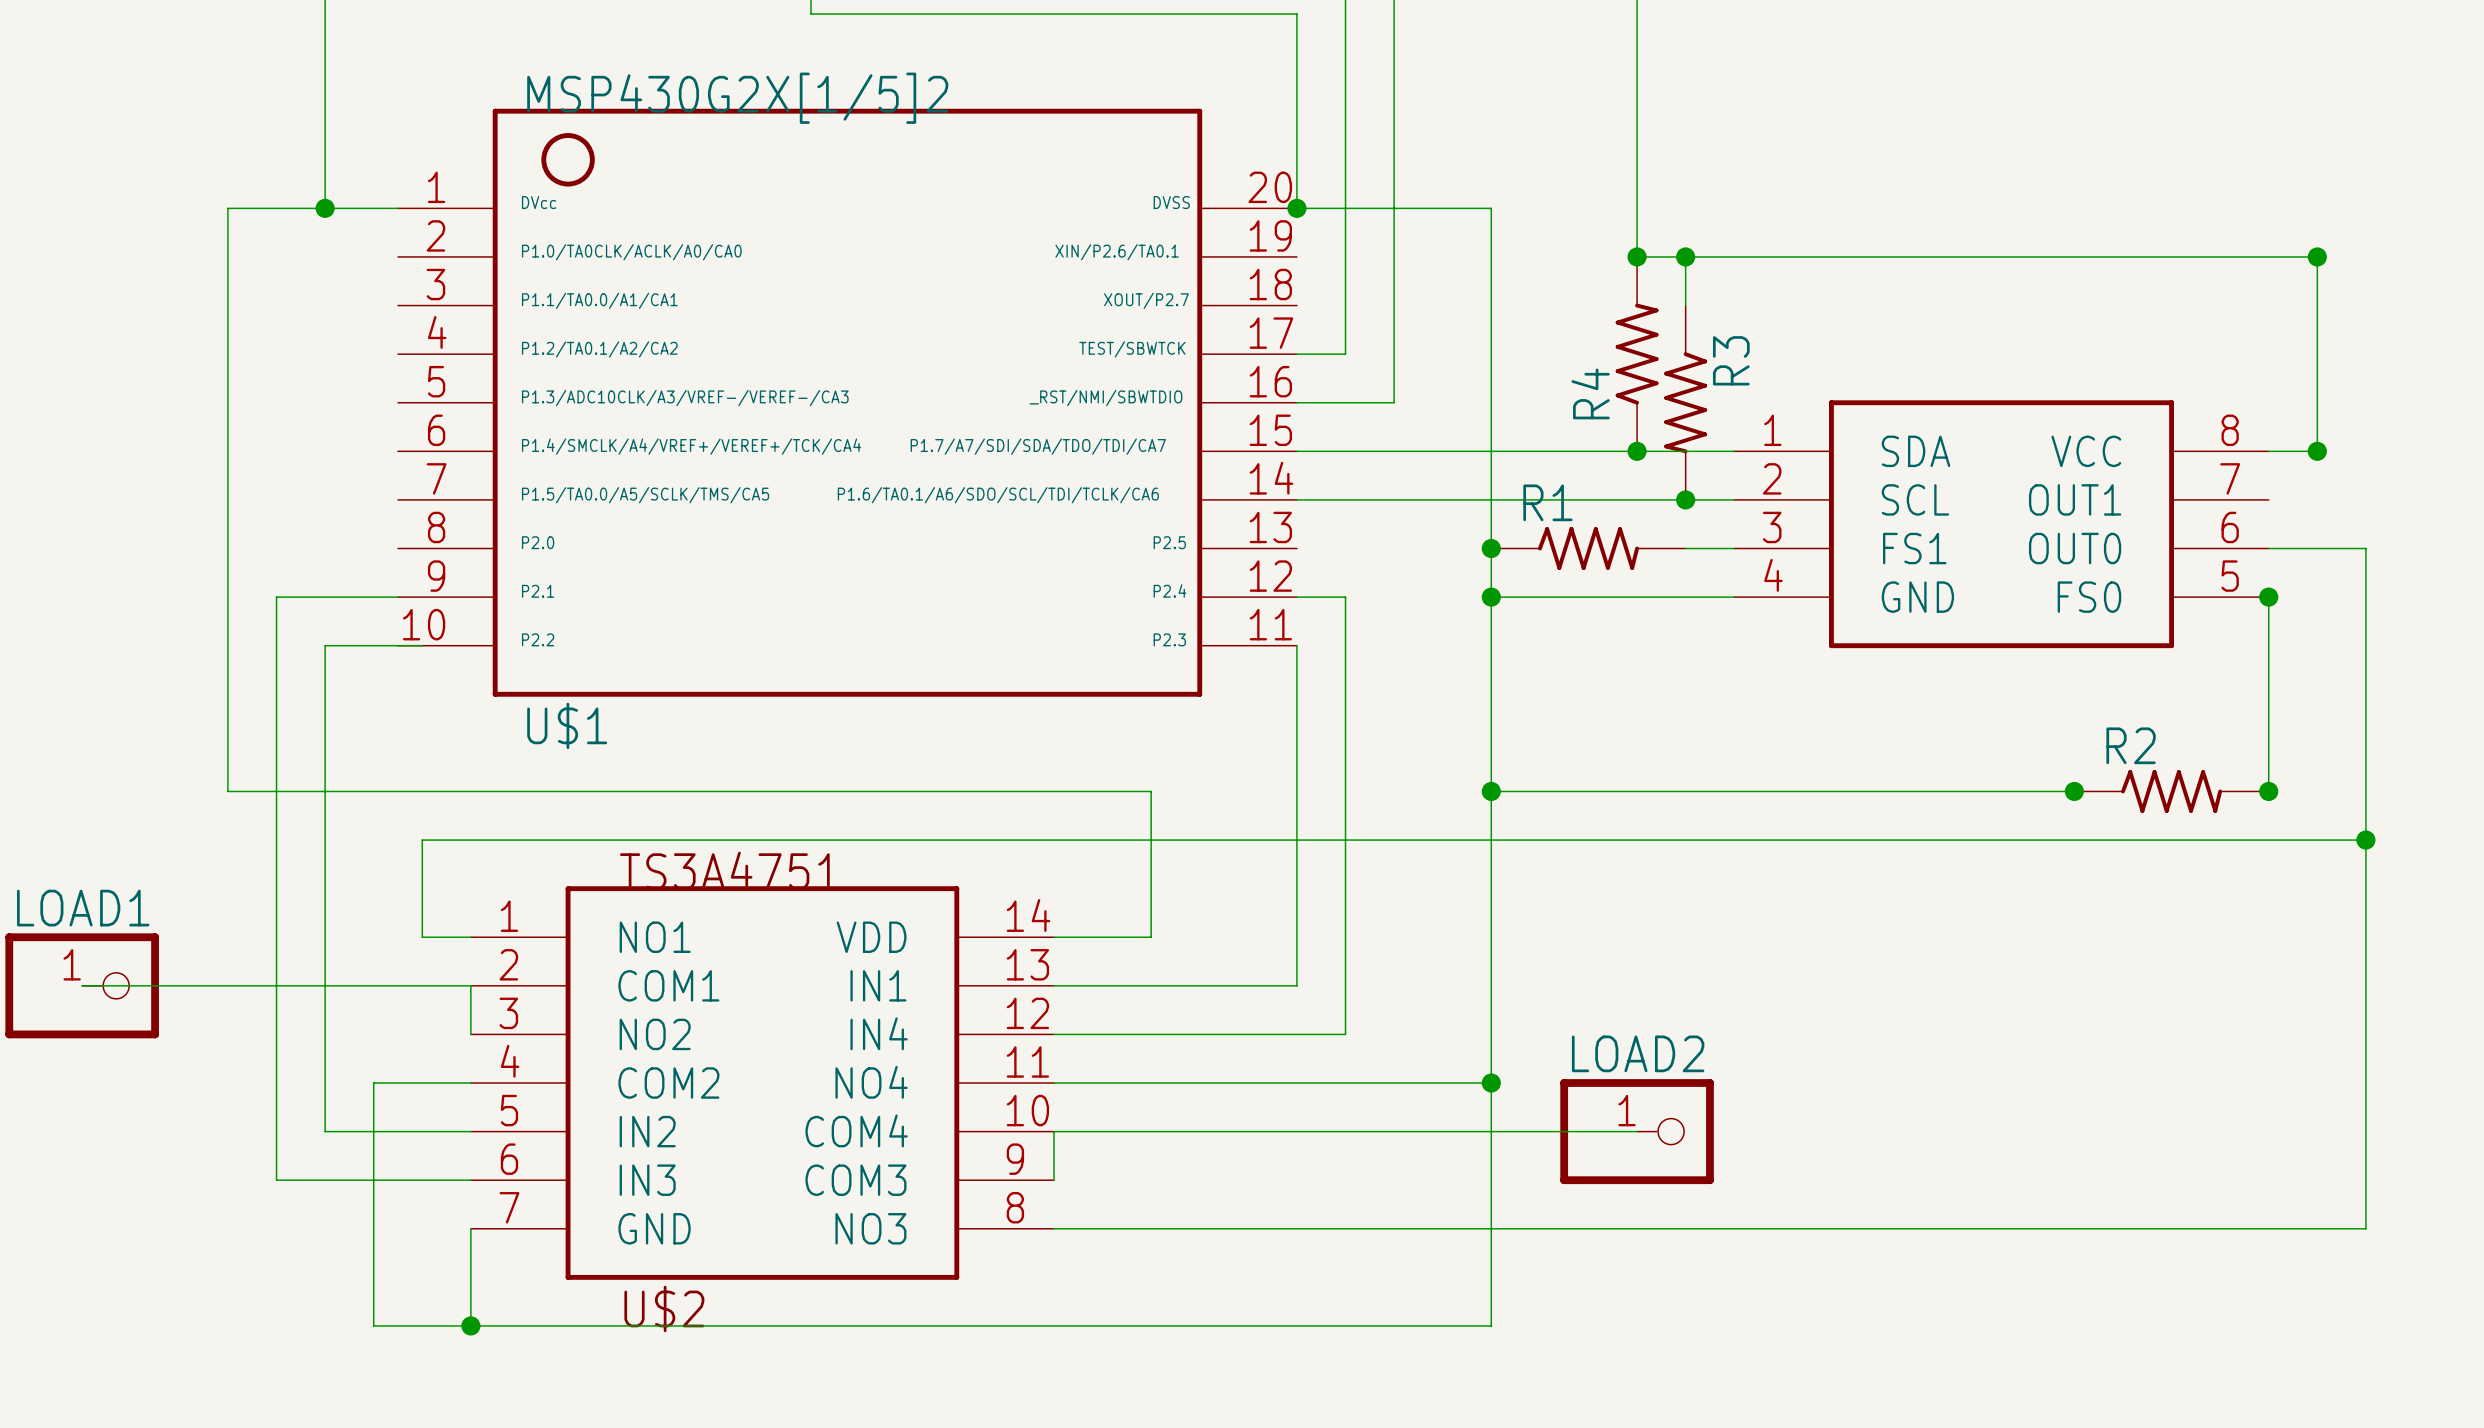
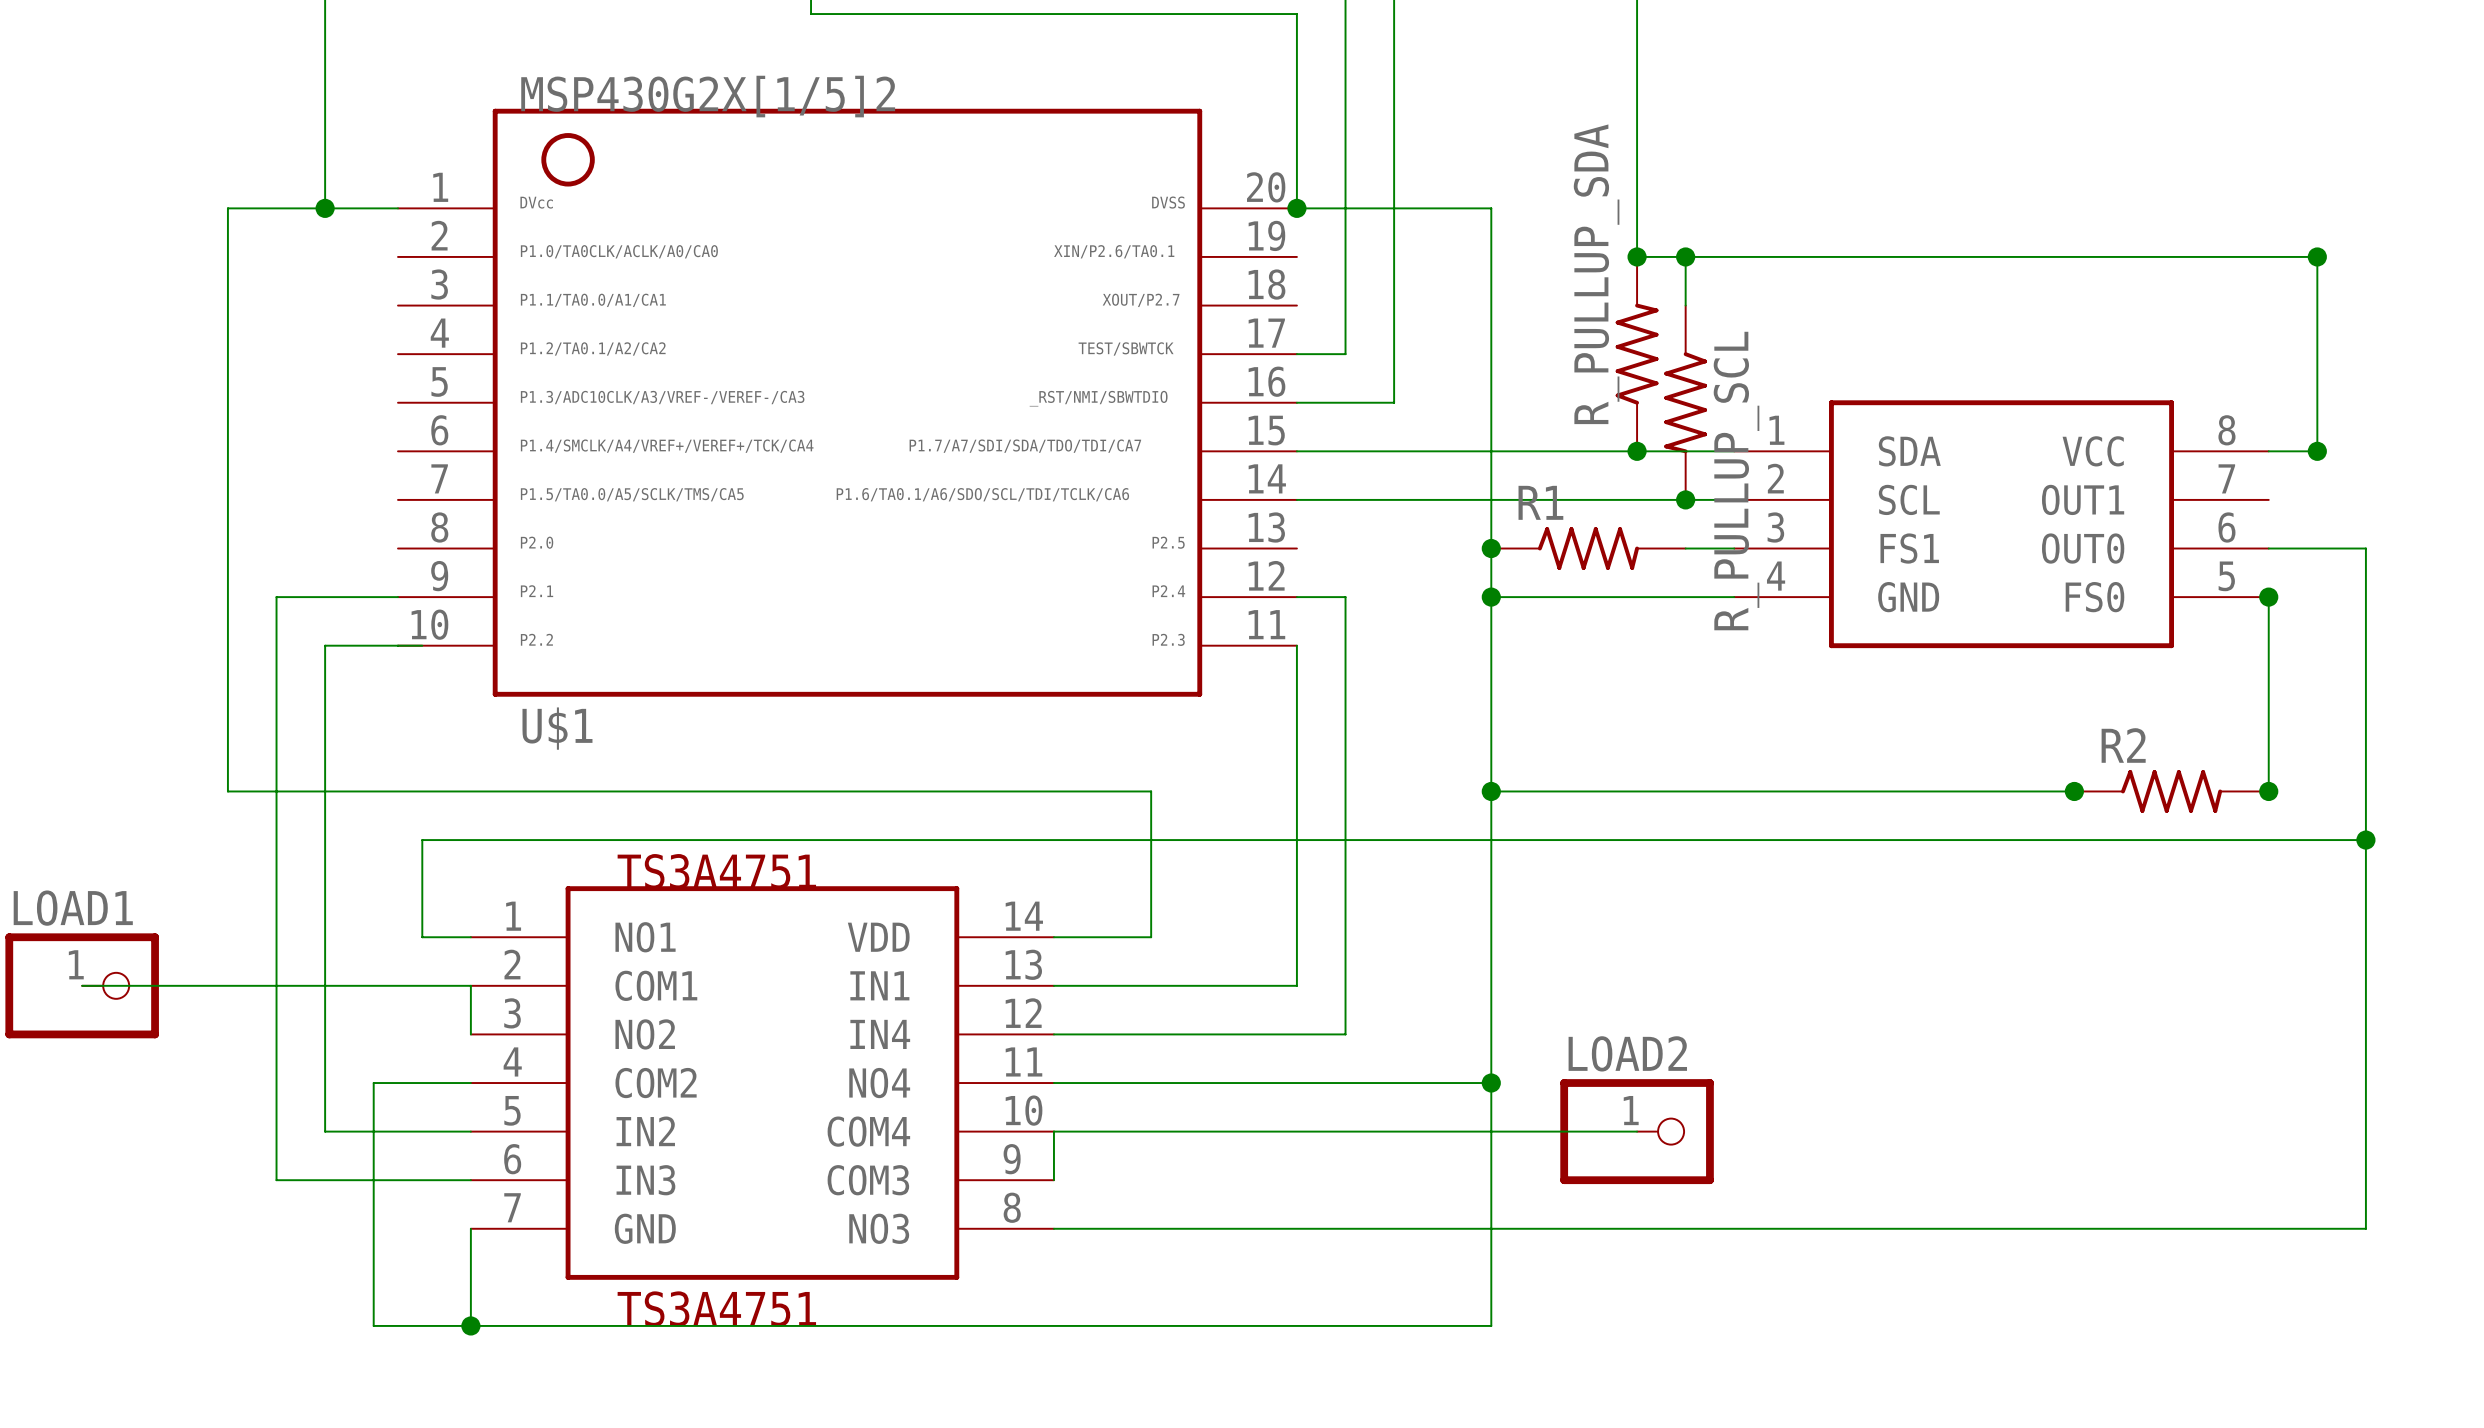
R3 name: R3 (1731, 360) -> R_PULLUP_SCL (1736, 481)
R4 name: R4 (1590, 393) -> R_PULLUP_SDA (1596, 274)
U$2 name: U$2 (664, 1308) -> TS3A4751 (716, 1308)

